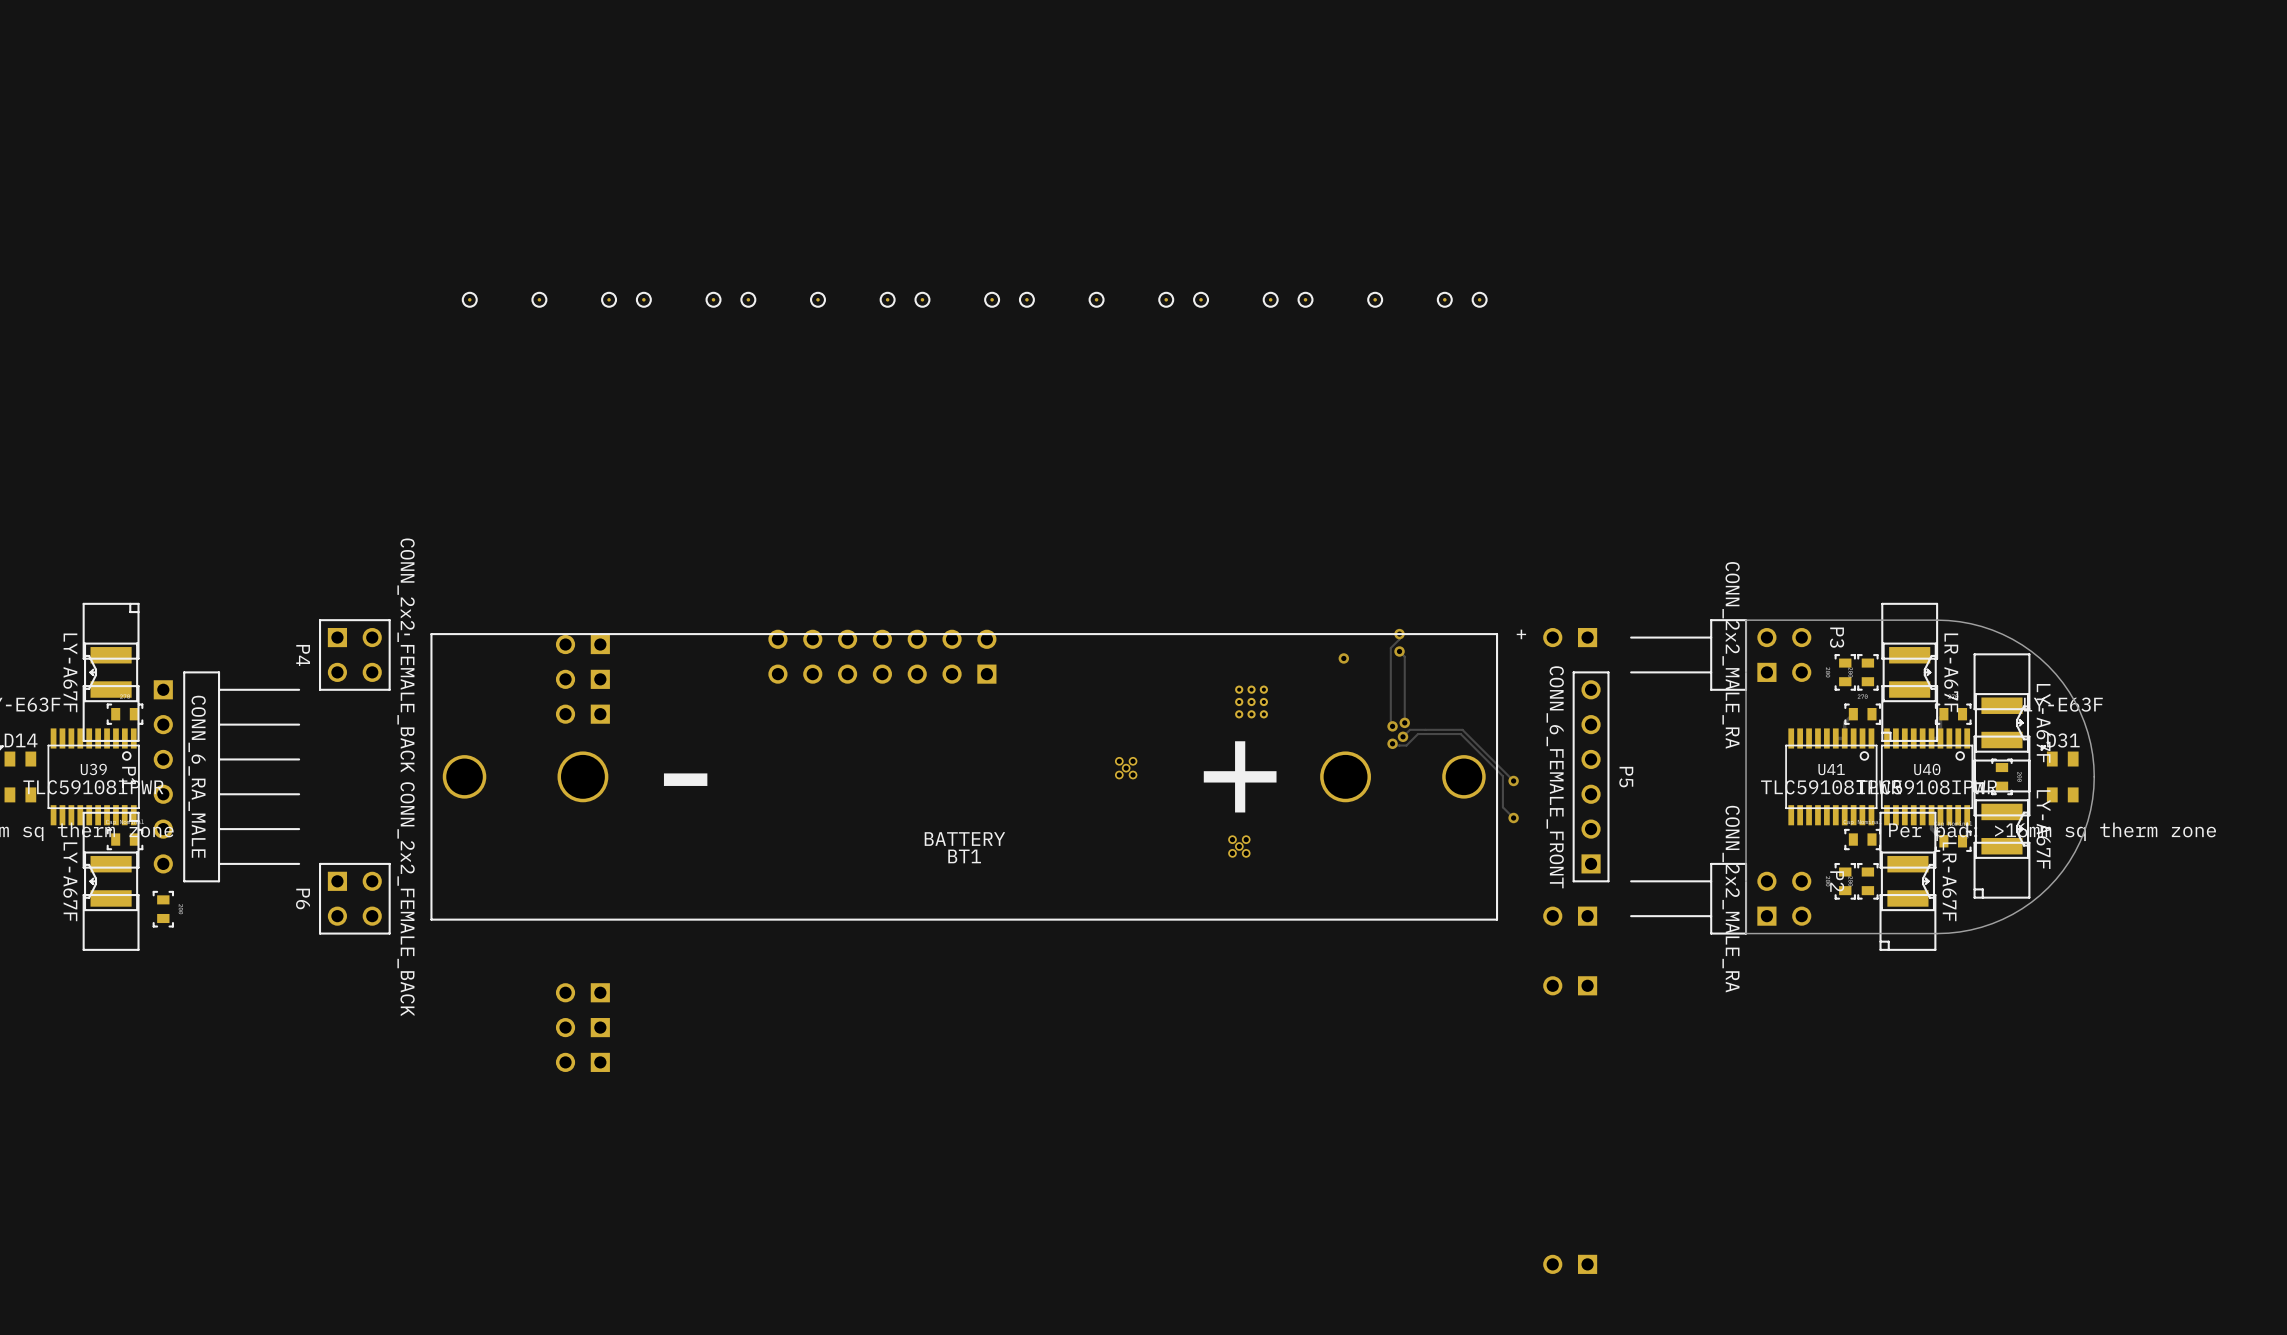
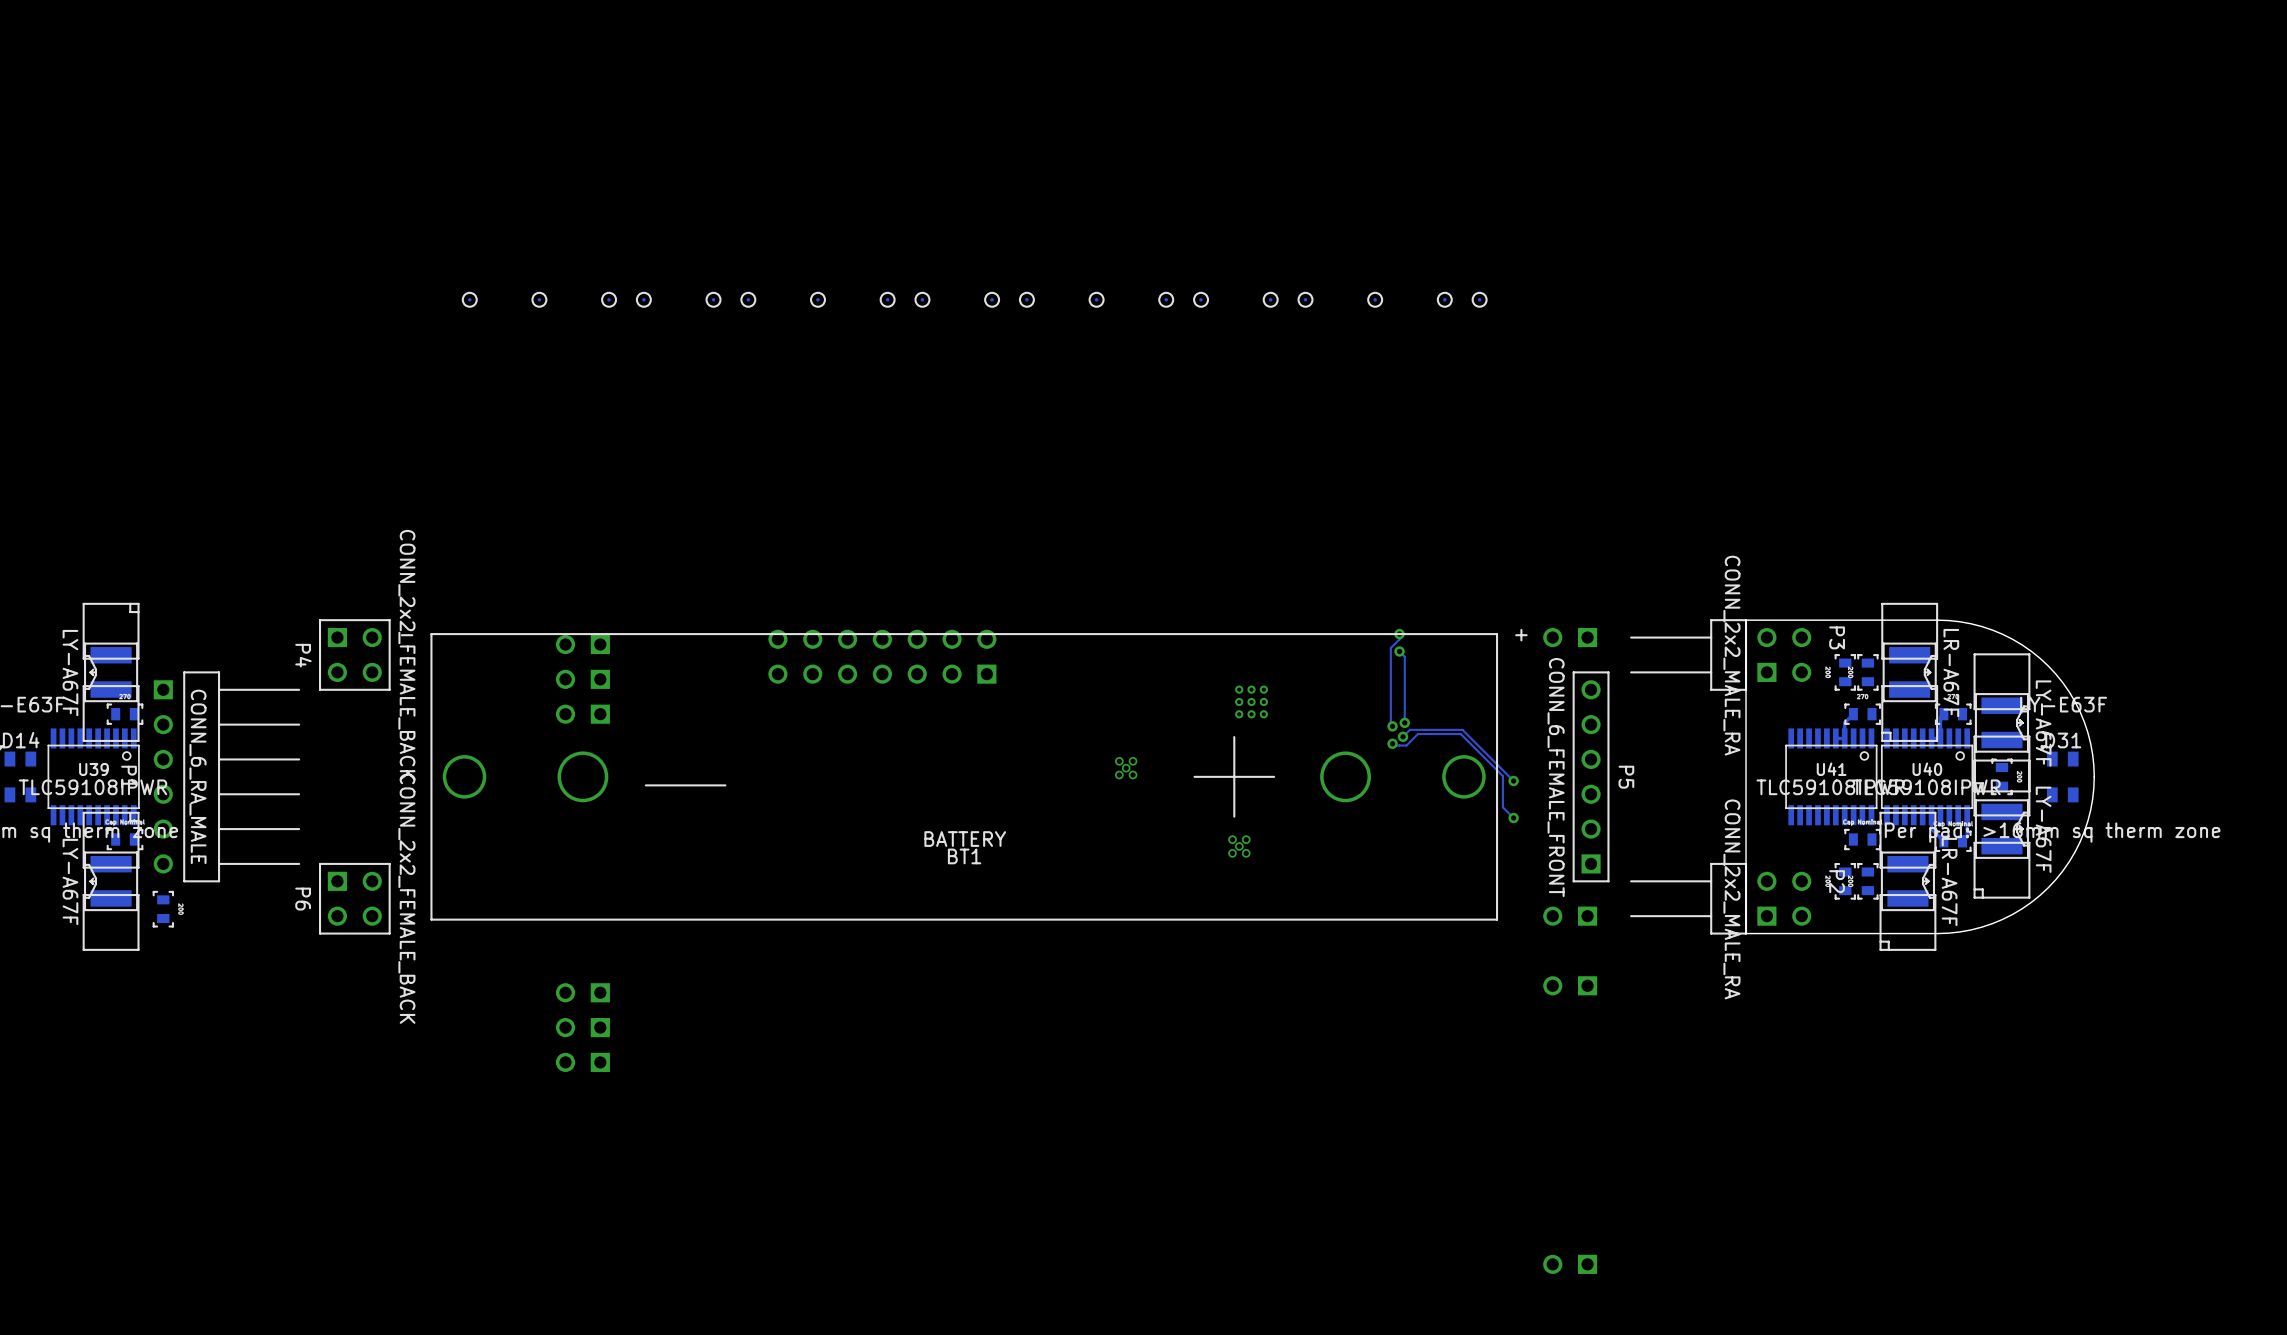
via: (1343, 658) -> none

